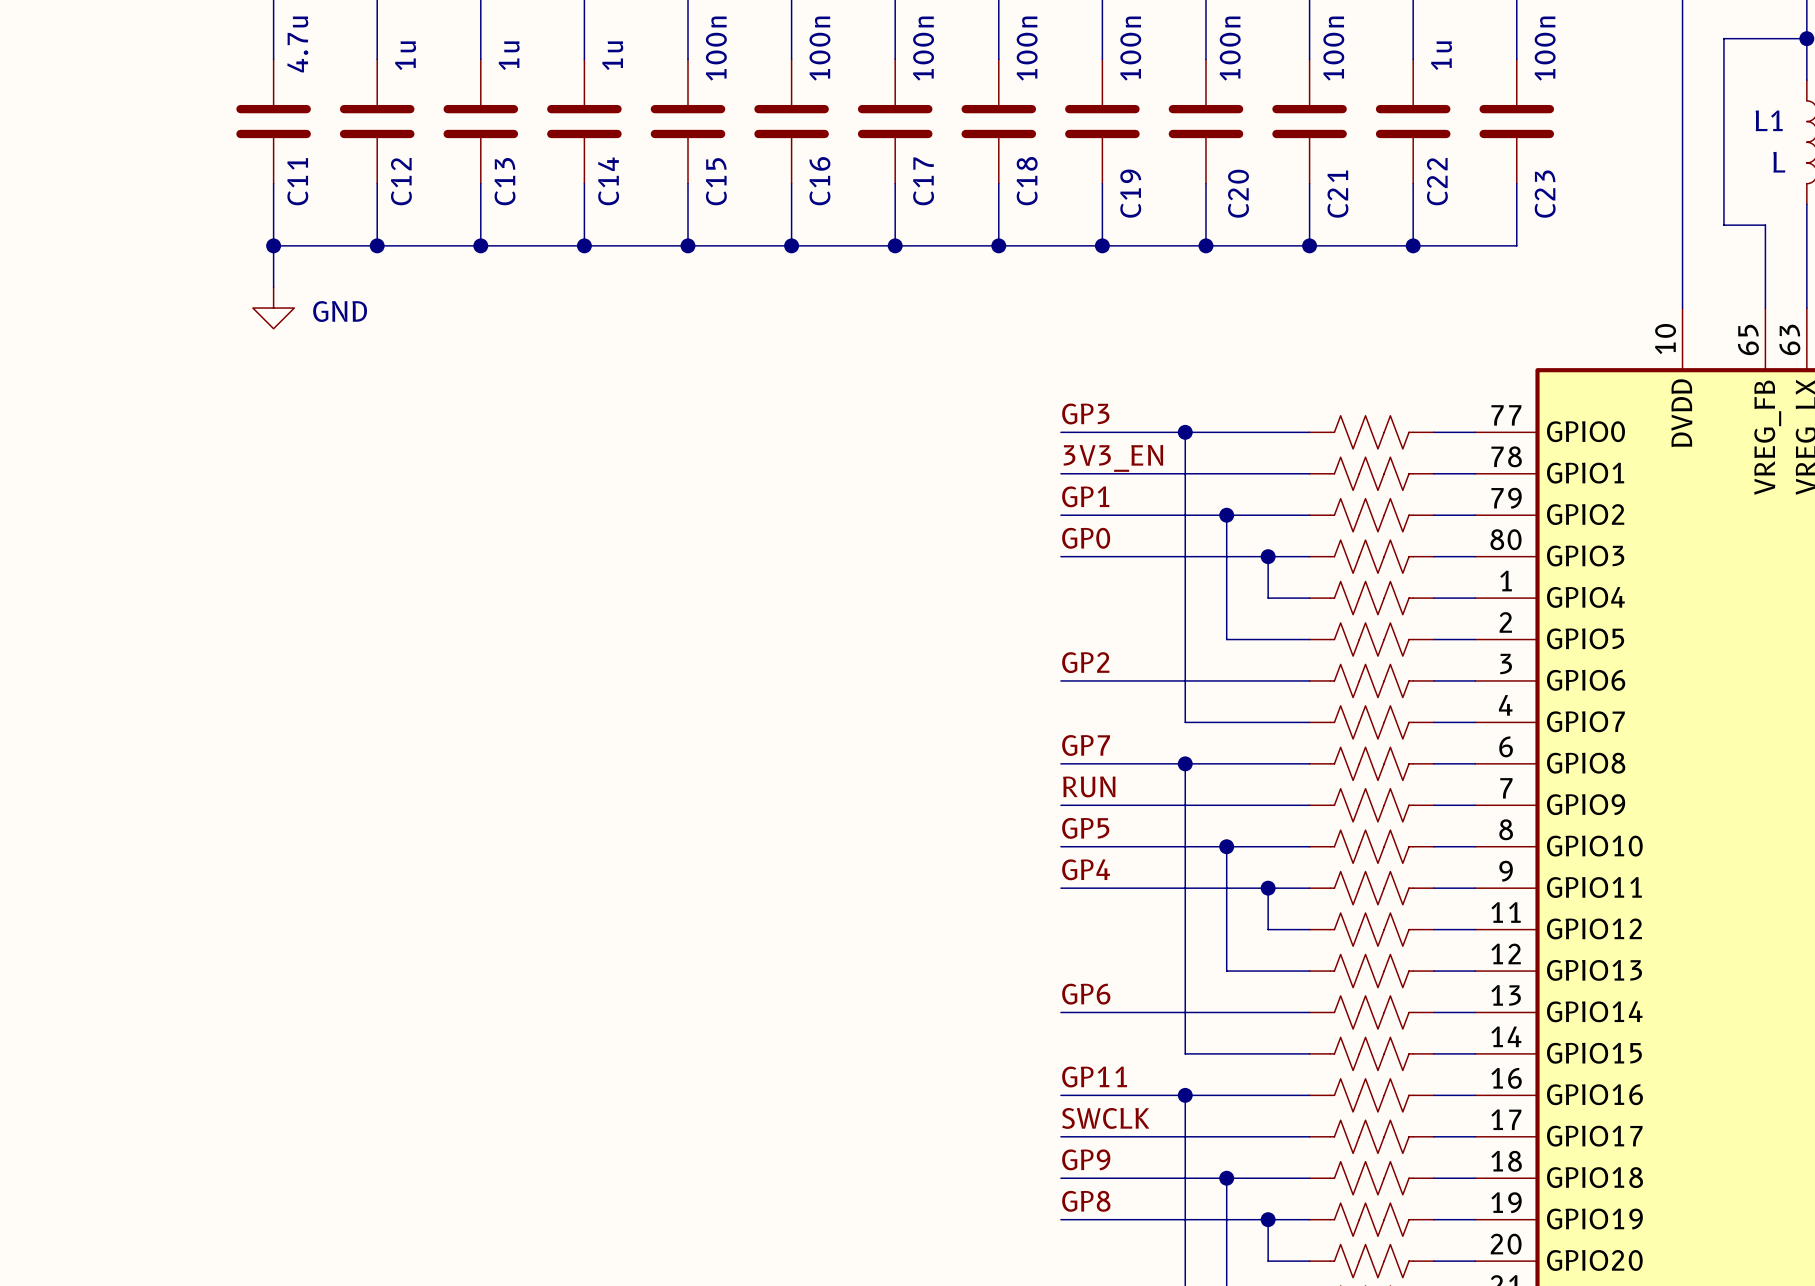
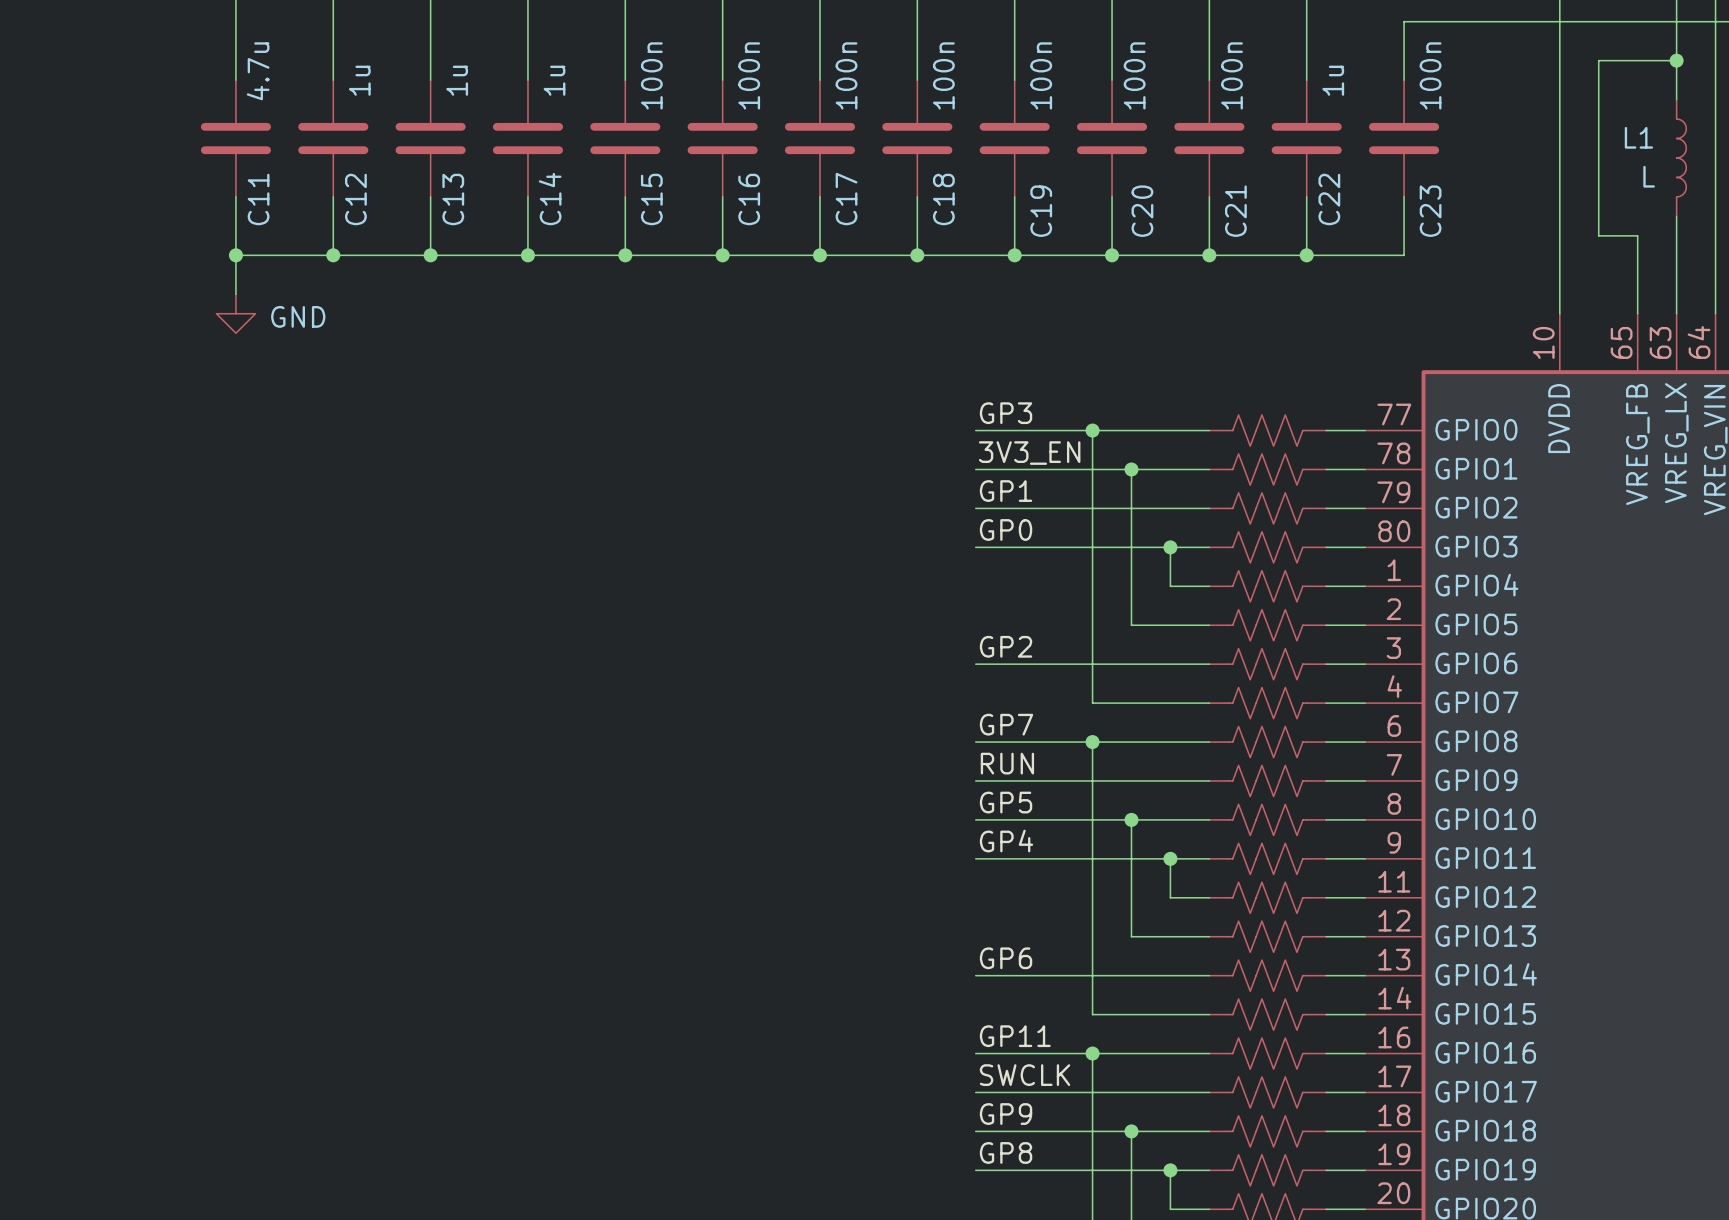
wire: none -> (1131, 469) (1131, 508)
junction position: (1226, 515) -> (1131, 469)

